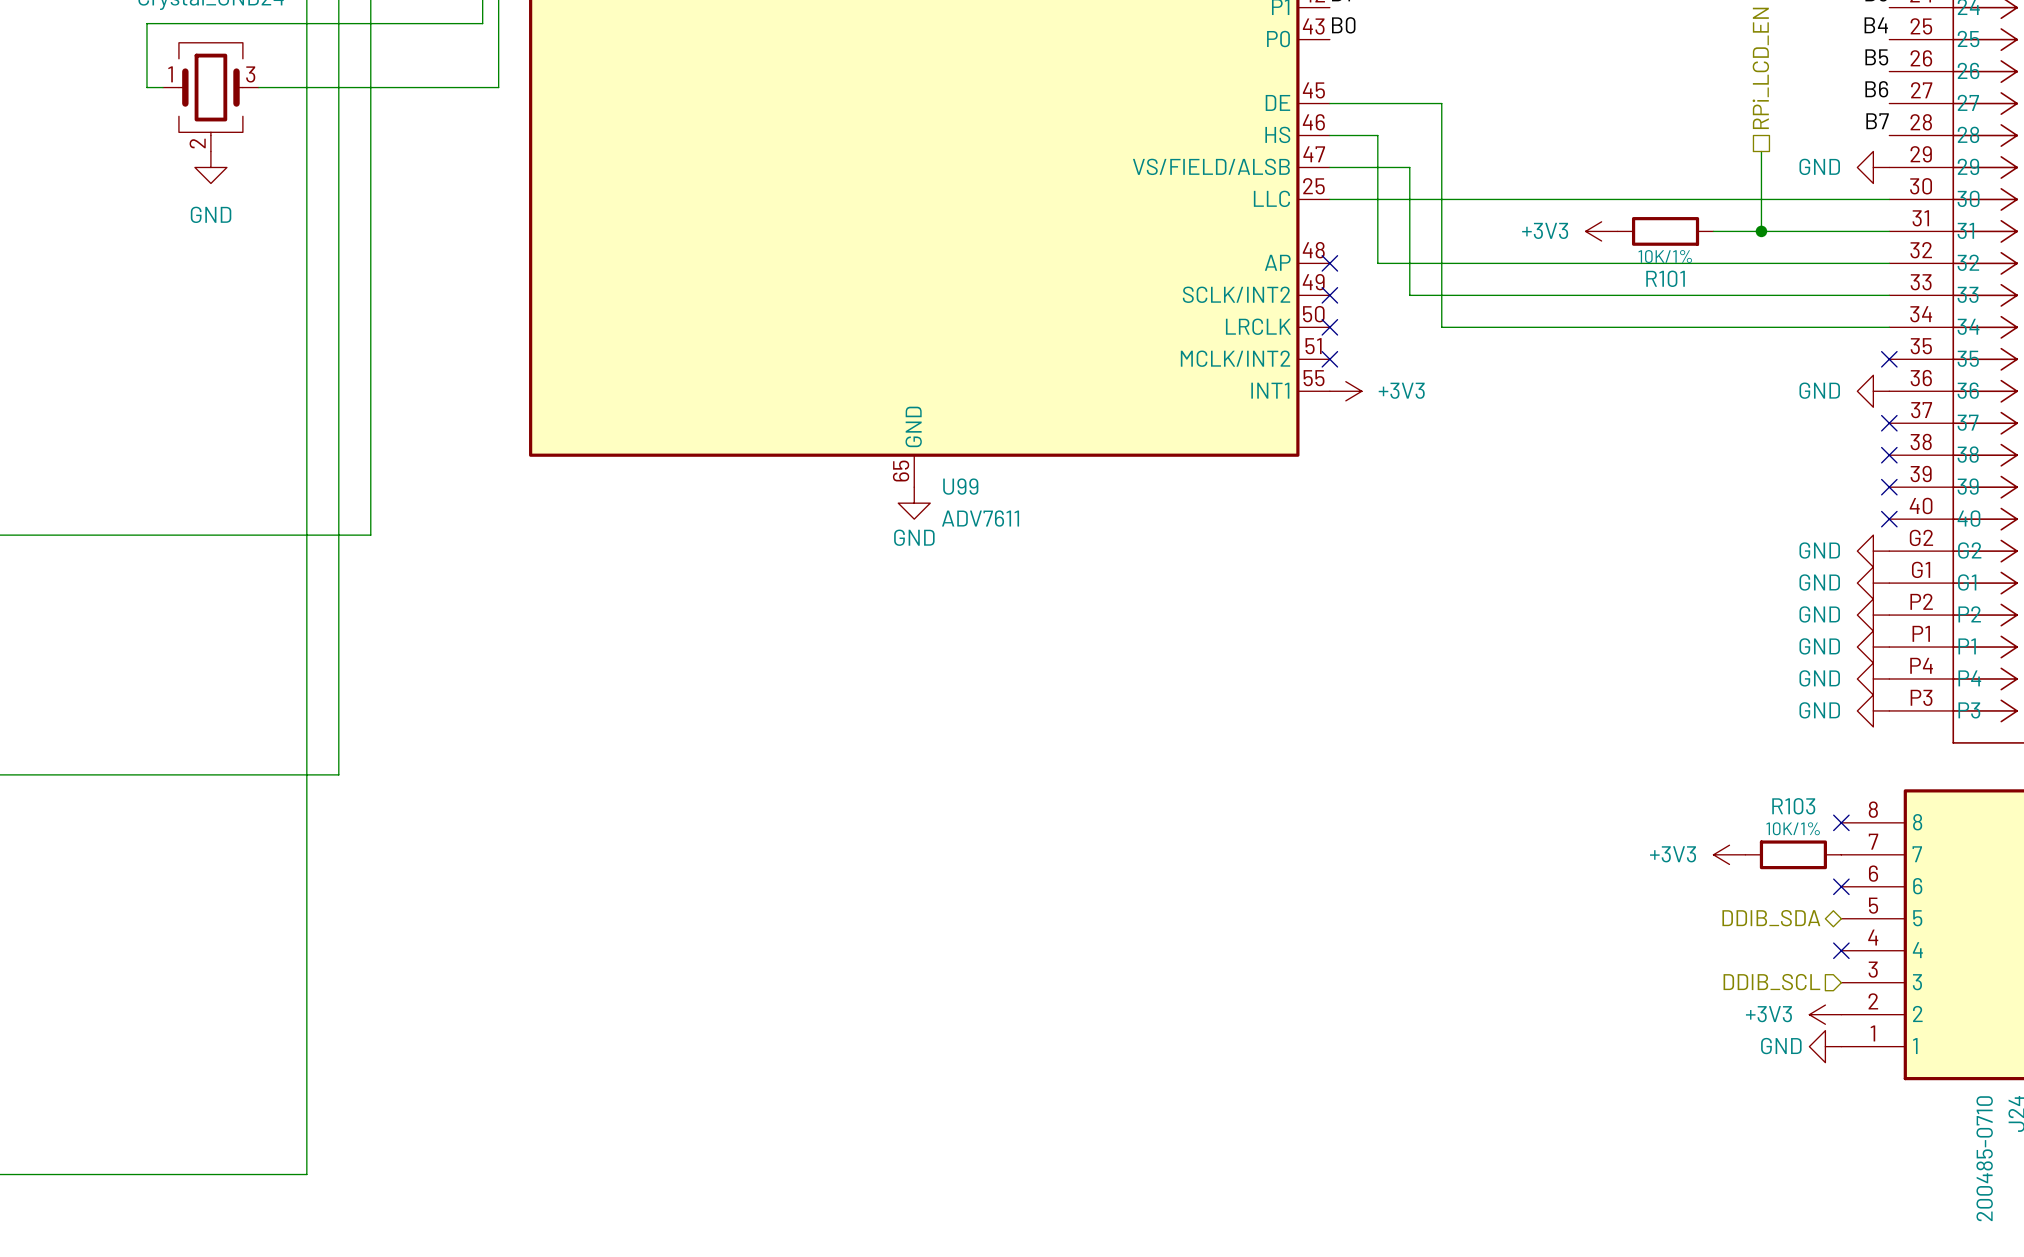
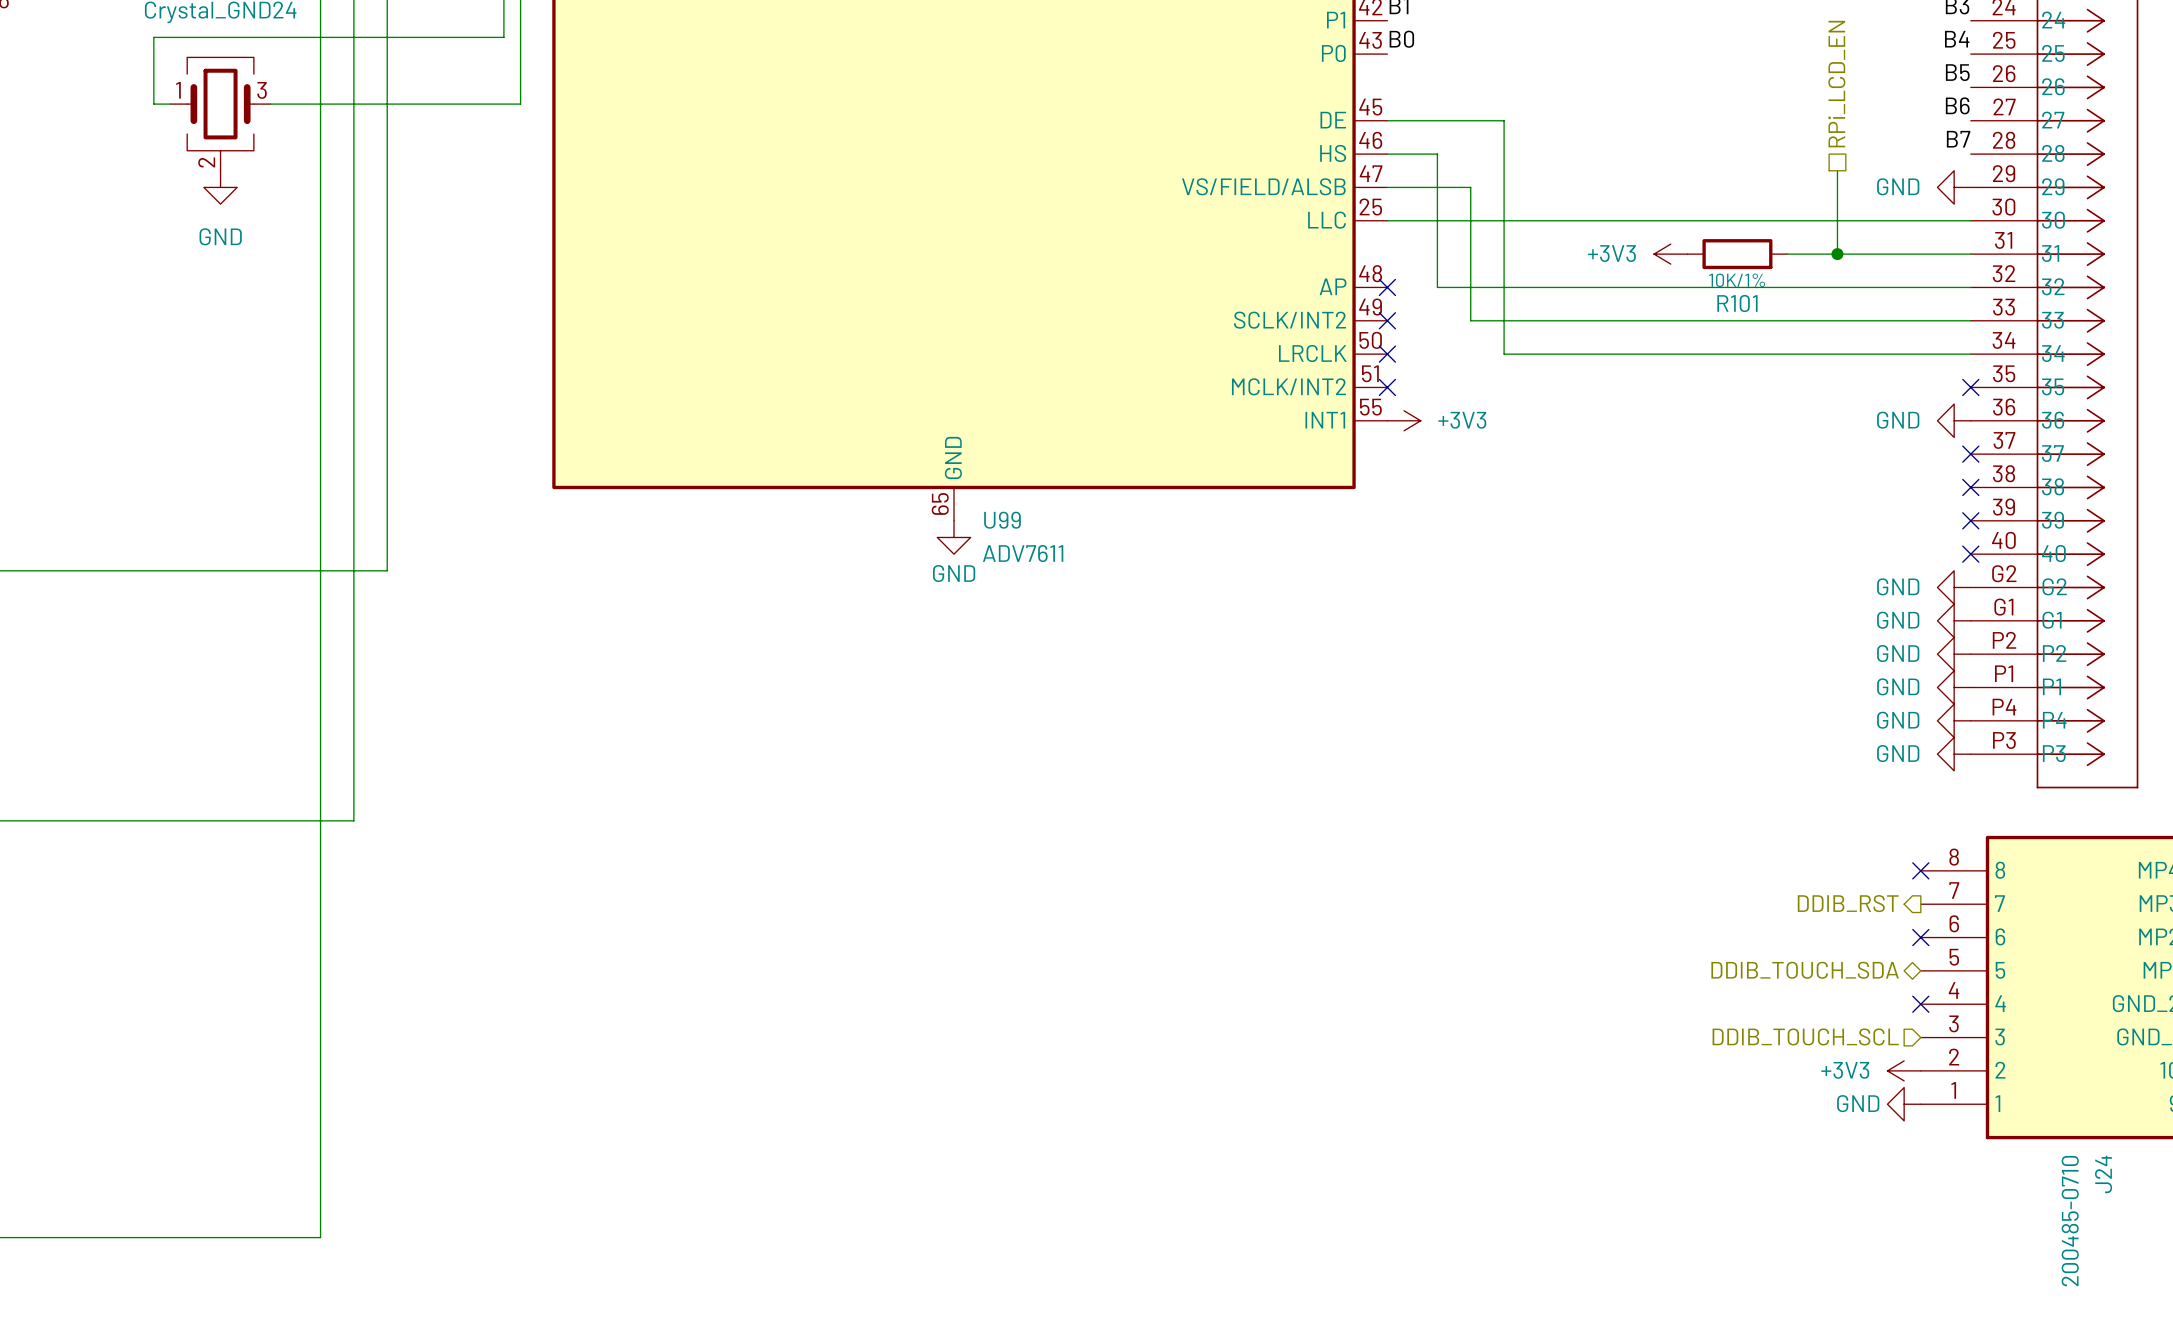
power symbol: +3V3 (1729, 854) -> none
hierarchical label: none -> DDIB_RST (1848, 903)
R103: 10K/1% (1793, 854) -> none
hierarchical label: DDIB_SDA (1771, 918) -> DDIB_TOUCH_SDA (1805, 970)
hierarchical label: DDIB_SCL (1771, 982) -> DDIB_TOUCH_SCL (1805, 1036)

